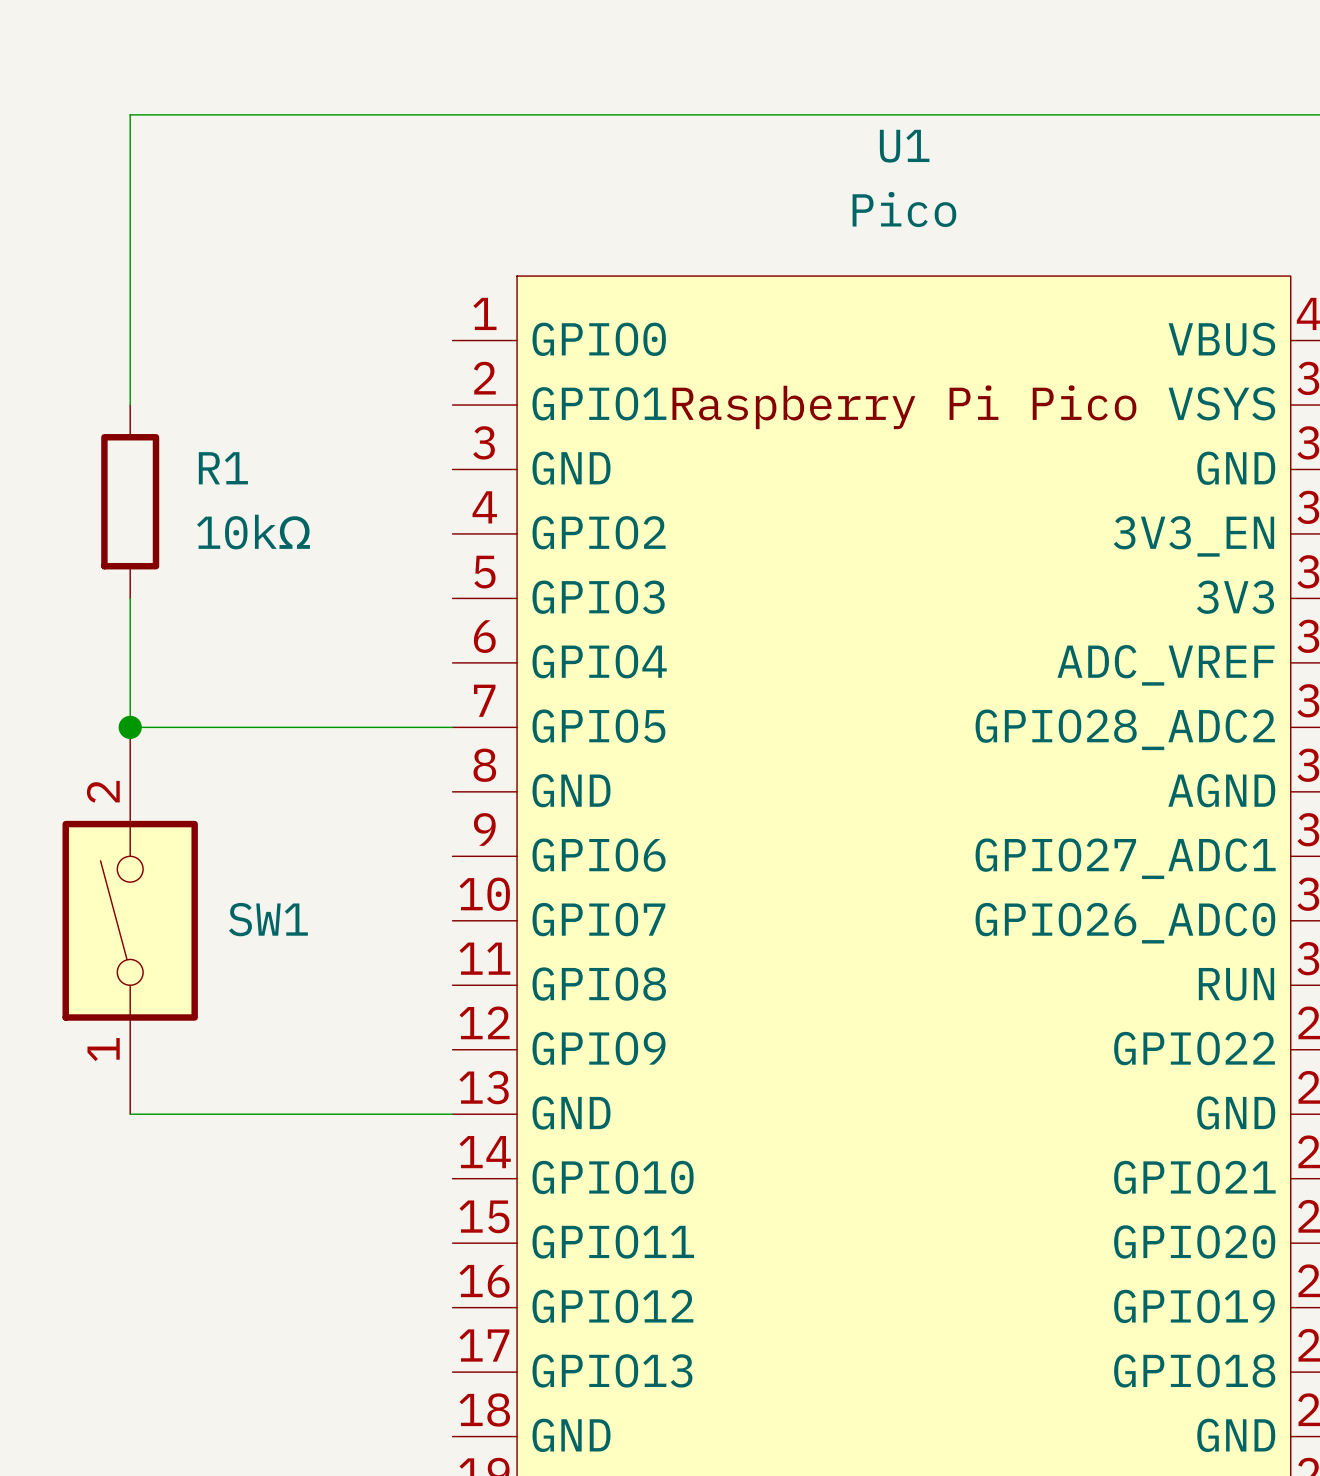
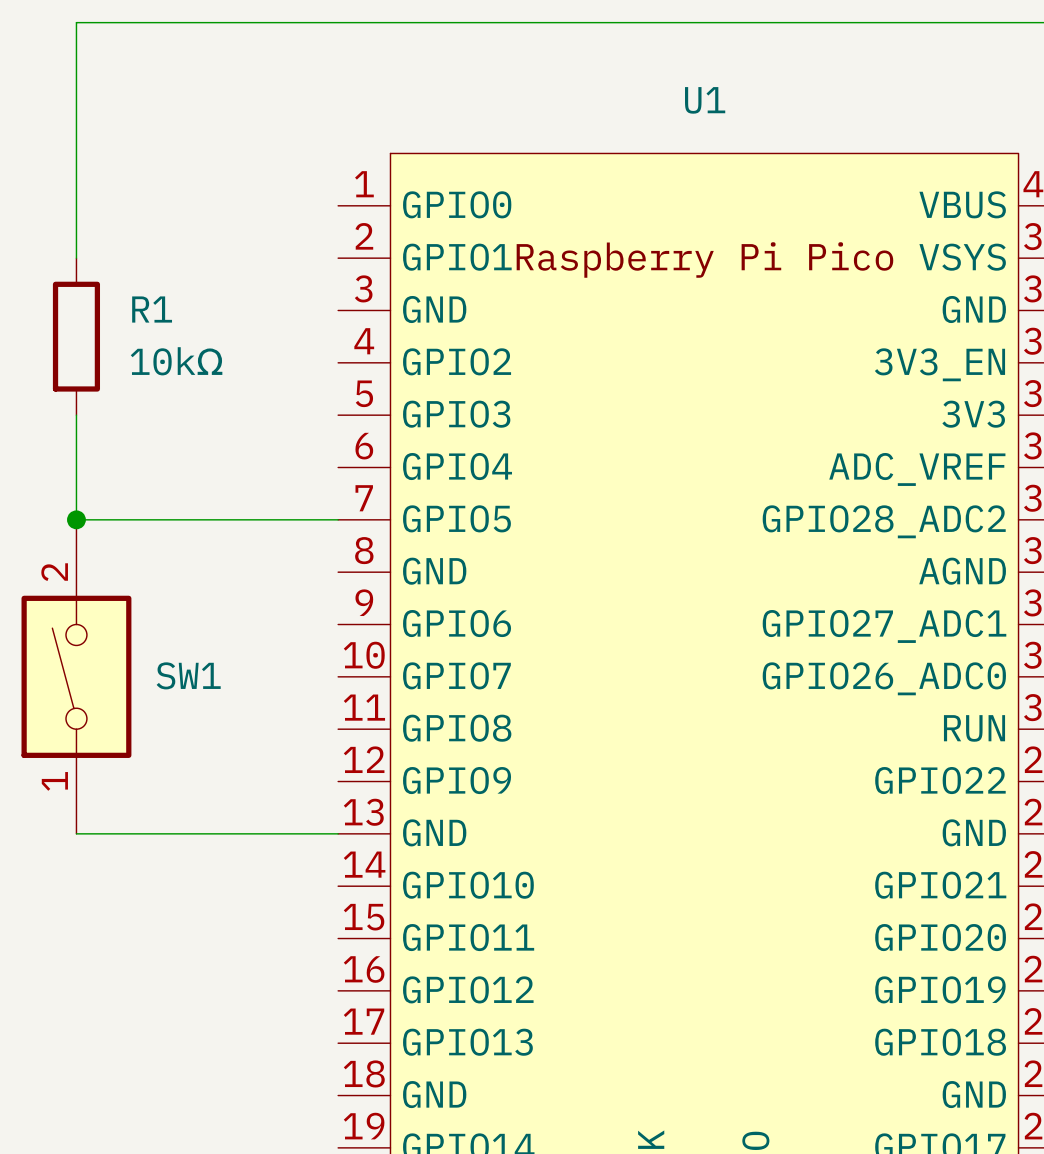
U1 name position: U1 (904, 146) -> U1 (705, 100)
U1 value: Pico (904, 209) -> none

